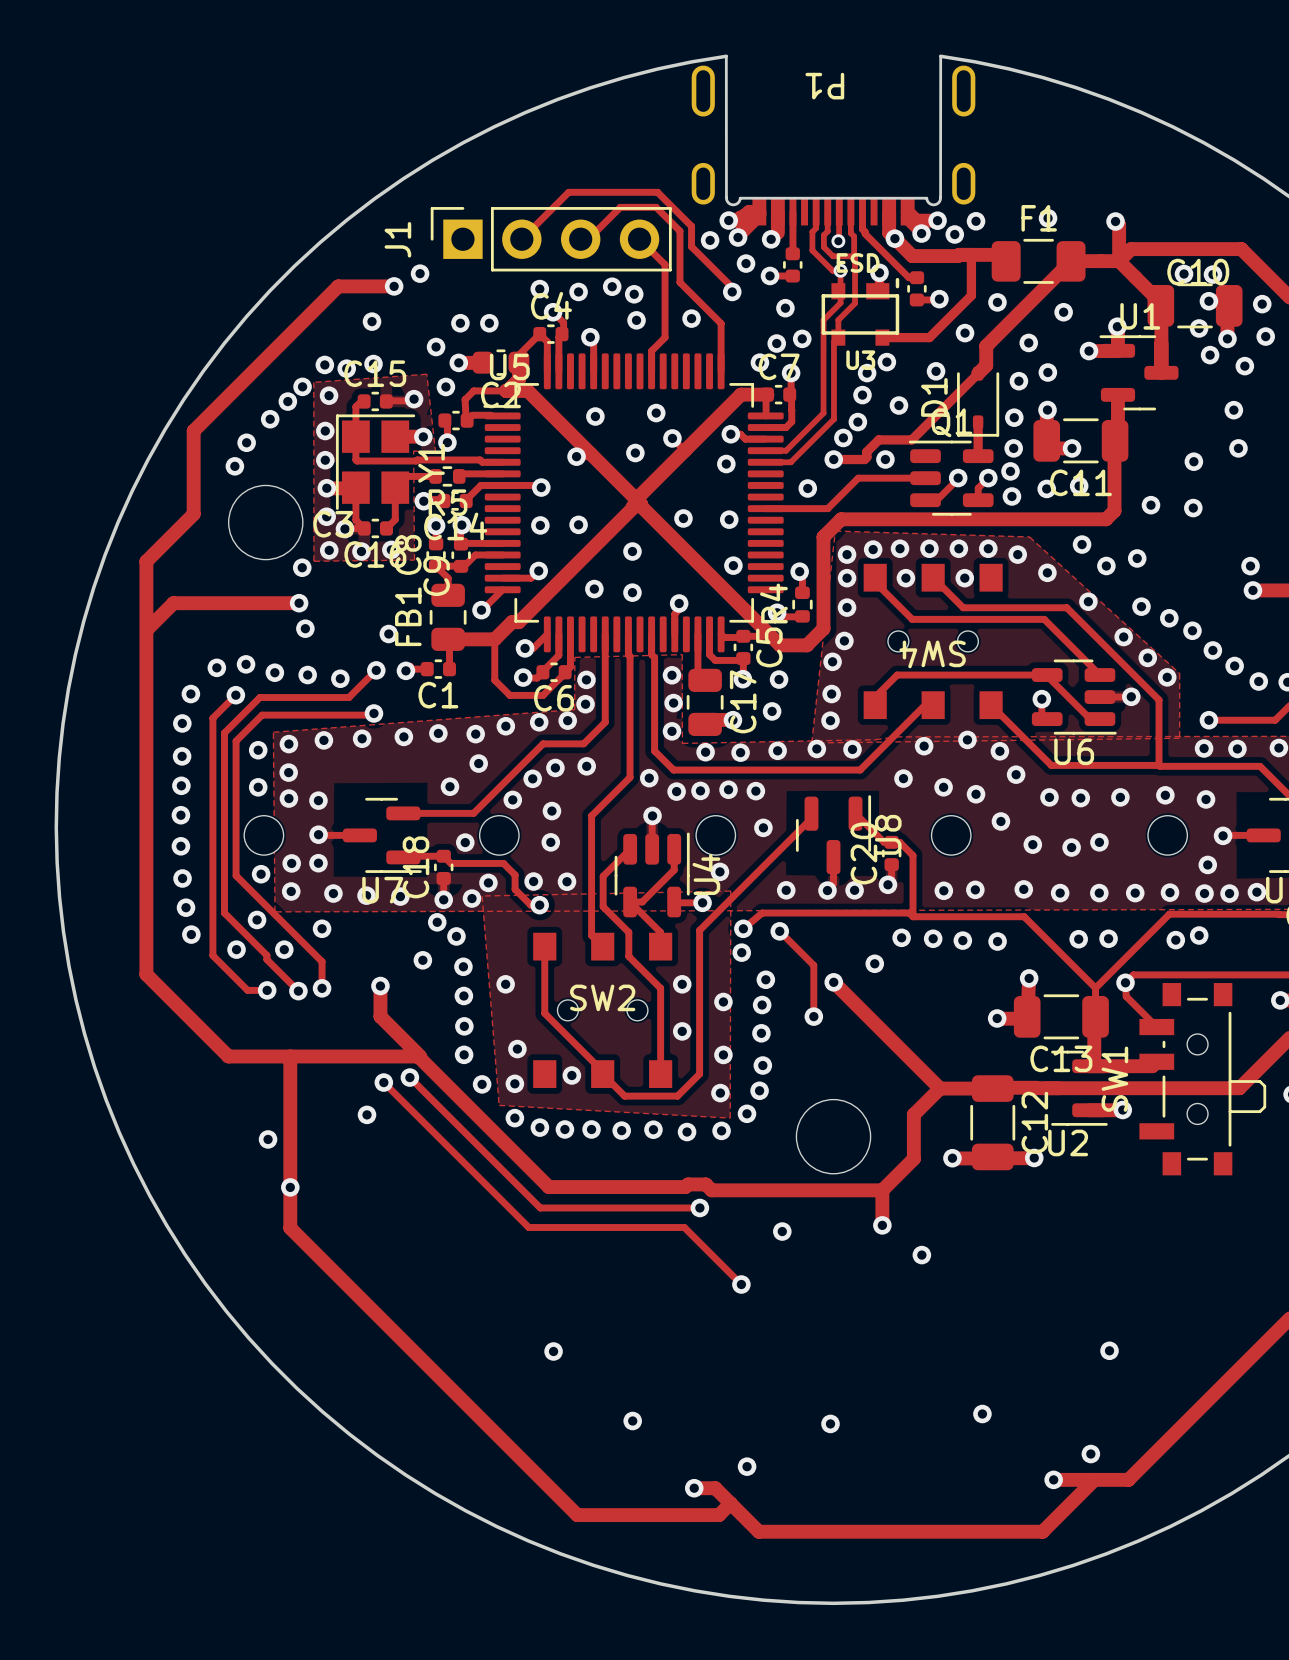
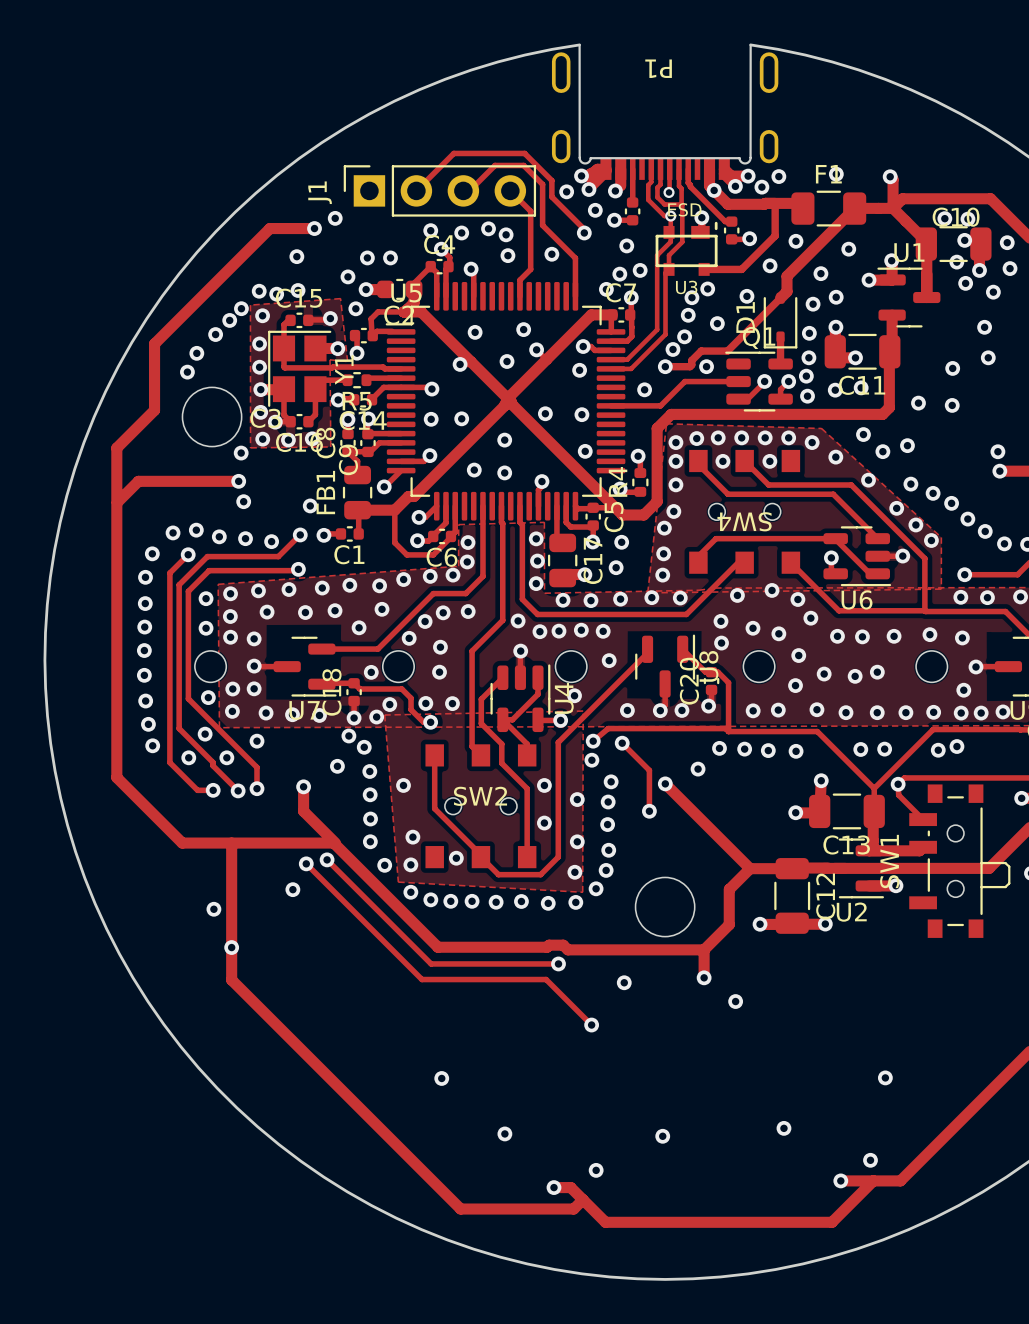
via: none -> (335, 610)
via: none -> (267, 612)
via: none -> (305, 612)
via: none -> (721, 643)
via: none -> (795, 685)

